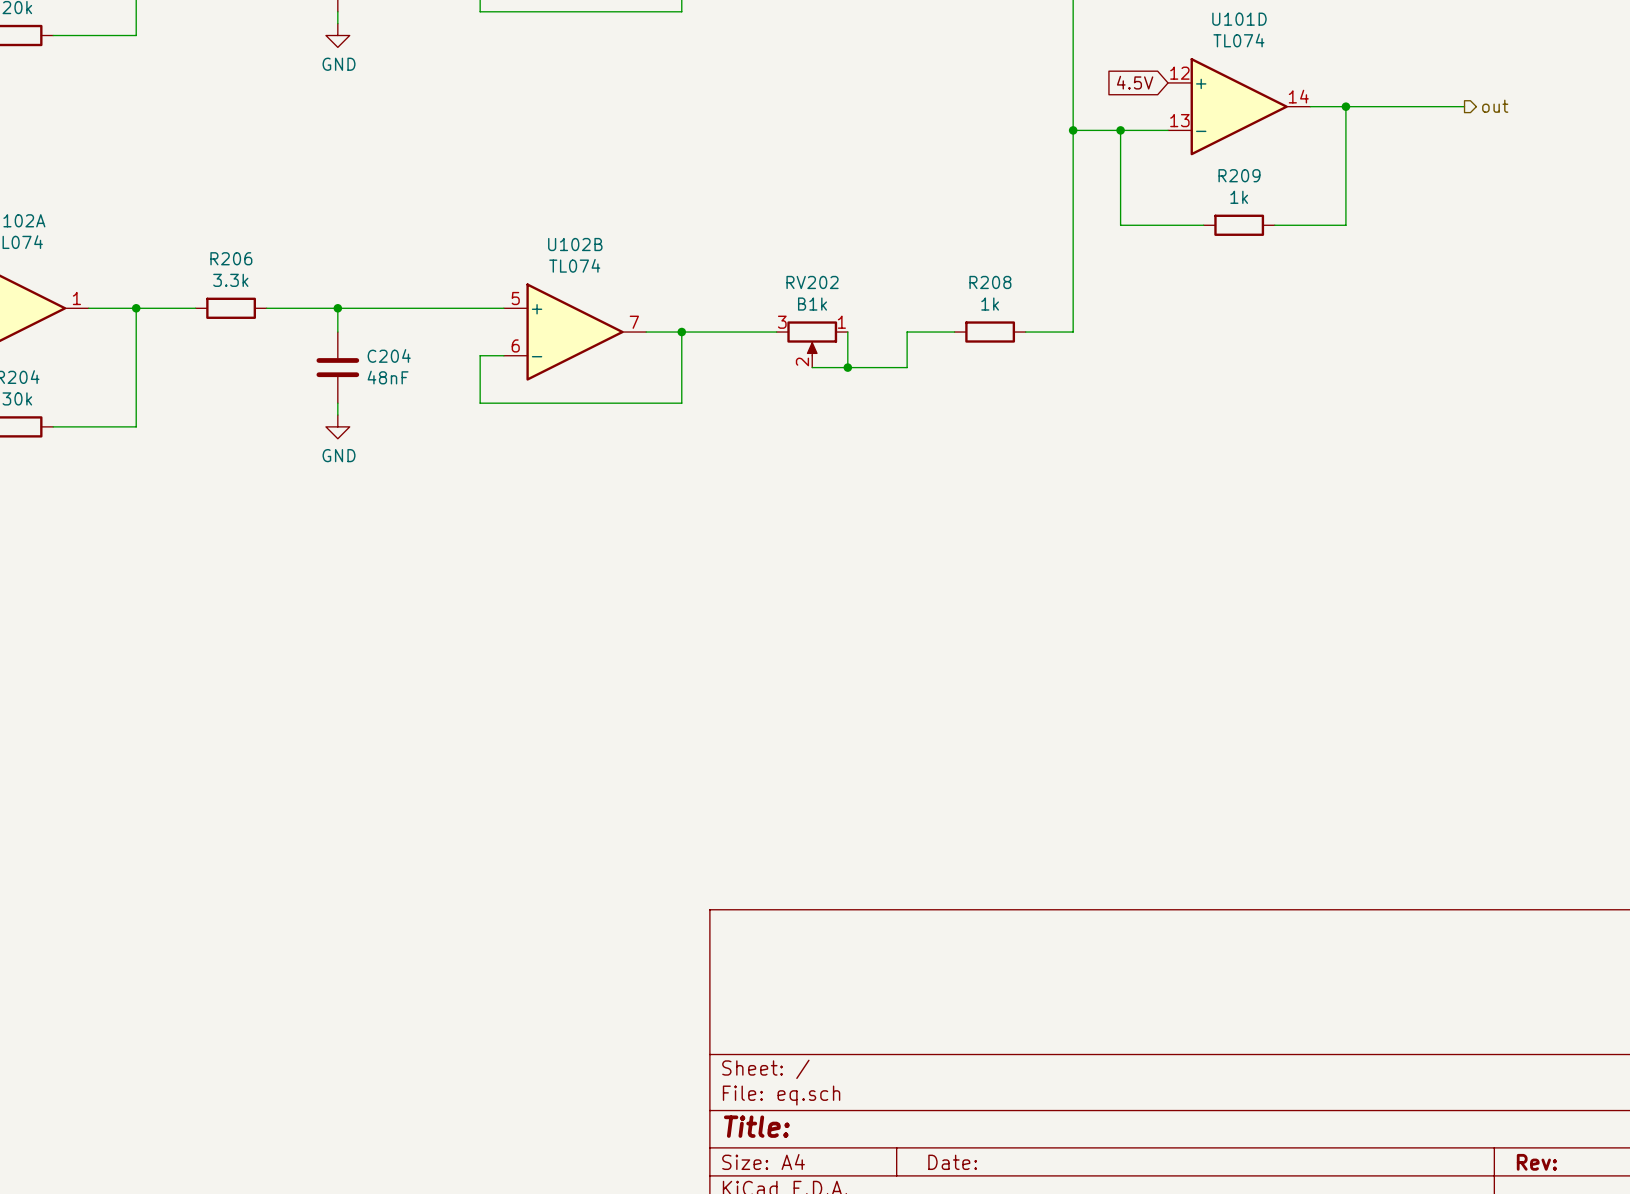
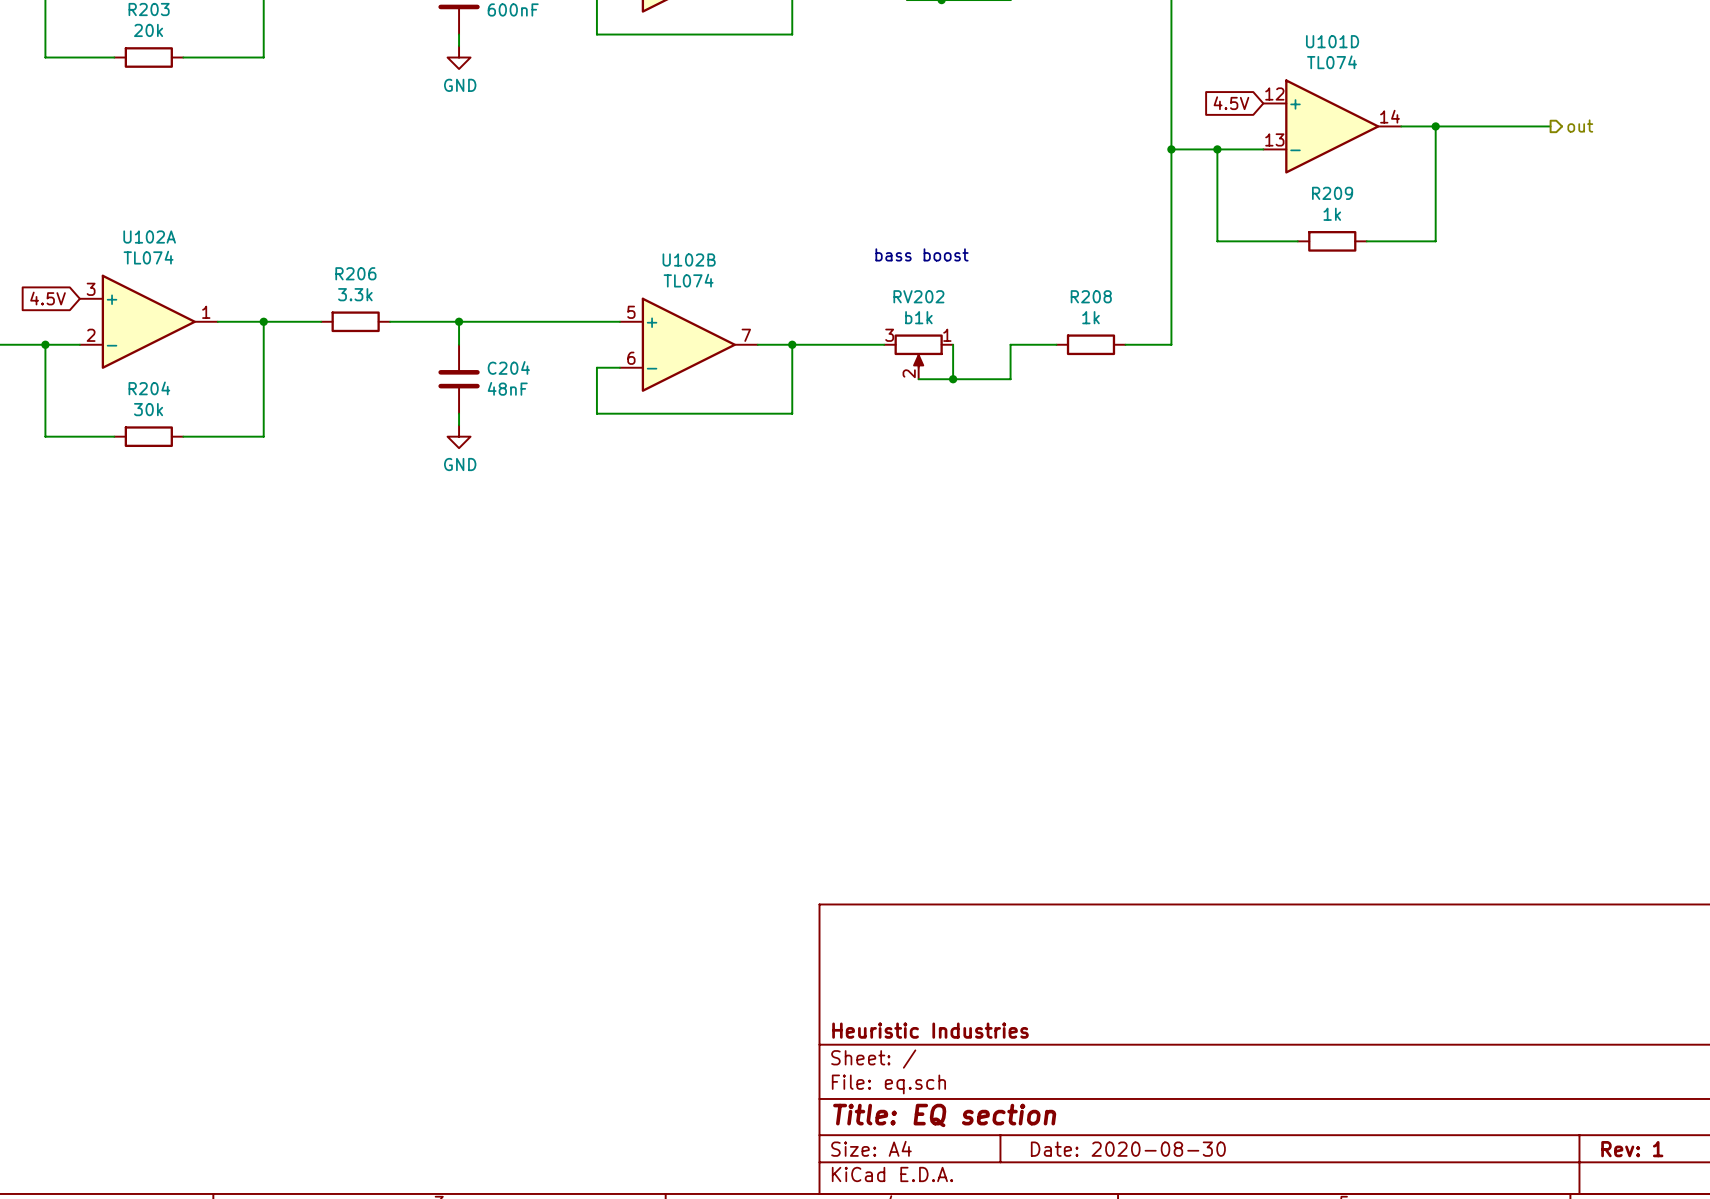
text: none -> bass boost (922, 254)
RV202 value: B1k (812, 304) -> b1k (918, 317)
title block: none -> Heuristic Industries (930, 1030)
title block: Title: (756, 1126) -> Title: EQ section (944, 1115)
title block: Date: (952, 1162) -> Date: 2020-08-30 (1128, 1149)
title block: Rev: (1536, 1162) -> Rev: 1 (1632, 1149)

